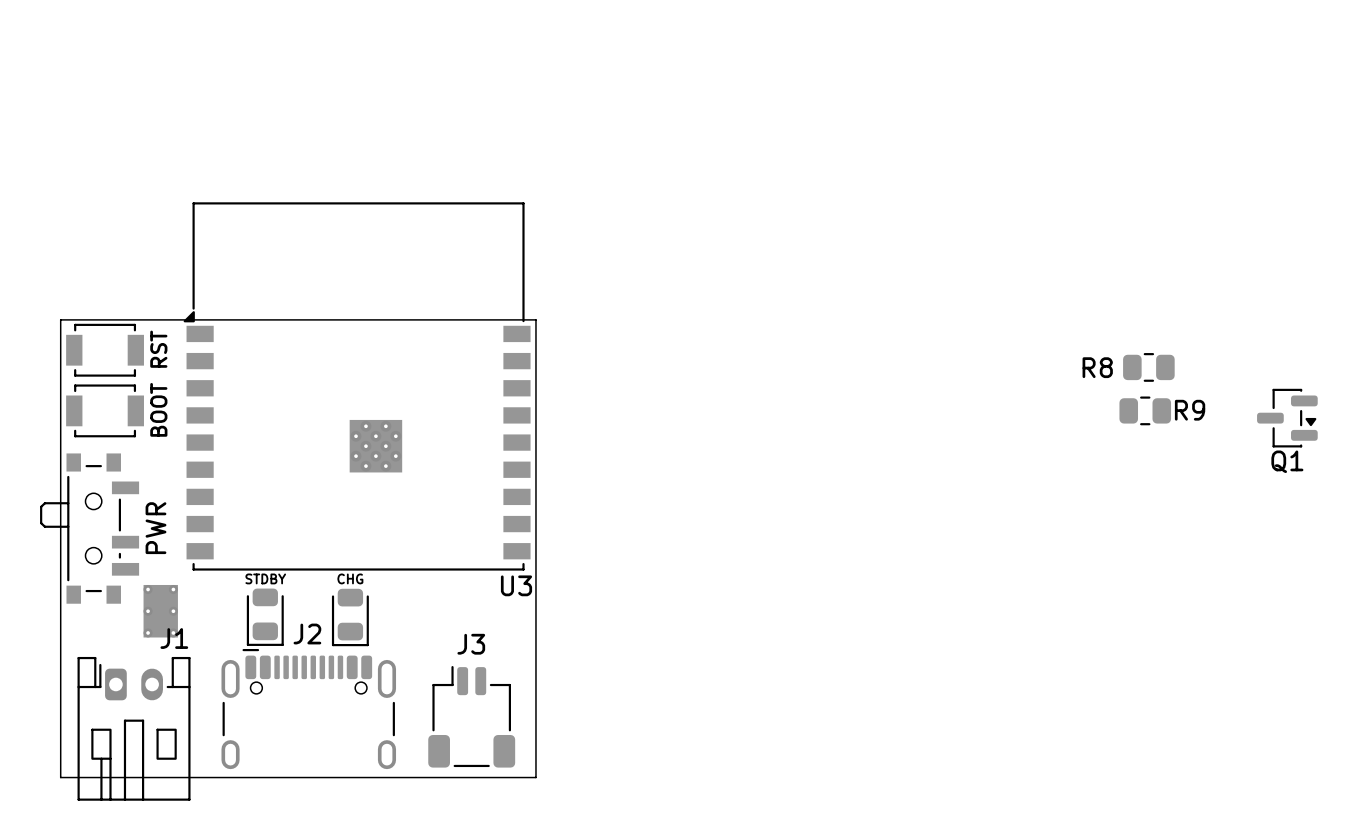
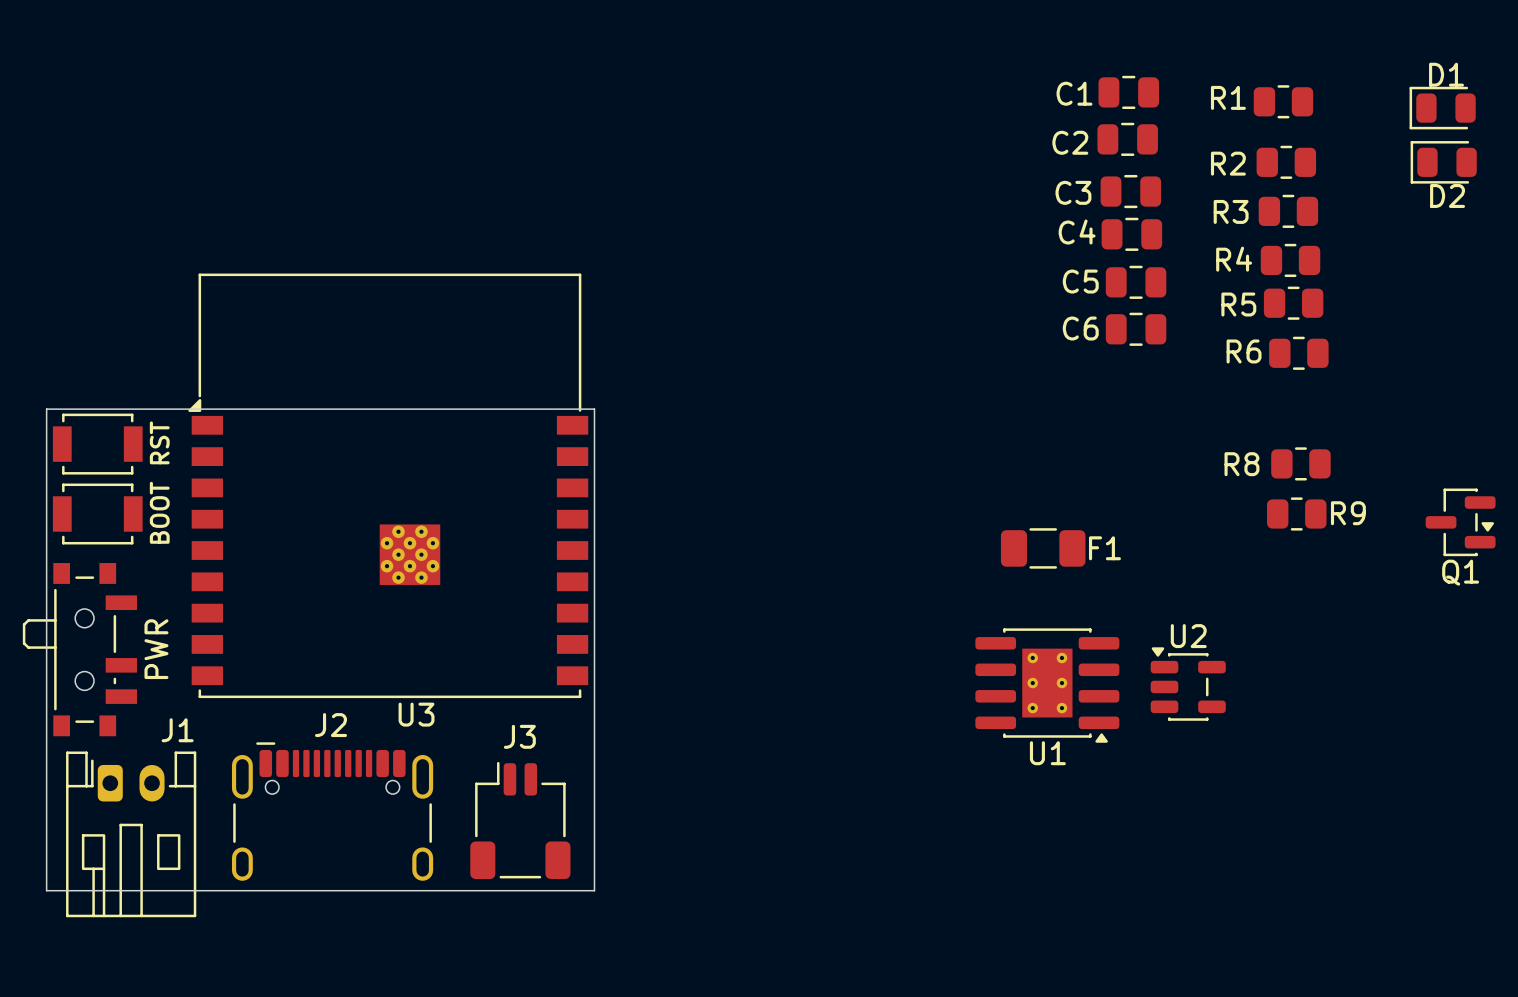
C1: none -> (1128, 92)
R1: none -> (1283, 101)
D1: none -> (1442, 108)
C2: none -> (1127, 139)
R2: none -> (1286, 162)
D2: none -> (1443, 162)
C3: none -> (1130, 191)
R3: none -> (1288, 211)
C4: none -> (1131, 234)
R4: none -> (1290, 260)
C5: none -> (1136, 282)
R5: none -> (1293, 303)
C6: none -> (1136, 329)
R6: none -> (1298, 353)
F1: none -> (1043, 548)
U2: none -> (1188, 684)
U1: none -> (1047, 685)
U3 name position: U3 (516, 585) -> U3 (416, 714)
part: (160, 611) -> none
STDBY: (265, 617) -> none
CHG: (350, 617) -> none
J2 position: (308, 709) -> (332, 811)
J3 position: (471, 716) -> (520, 820)
J1 position: (134, 728) -> (131, 834)
board edge: (60, 737) (60, 777) (535, 777) (535, 737) -> (46, 890) (594, 890)

